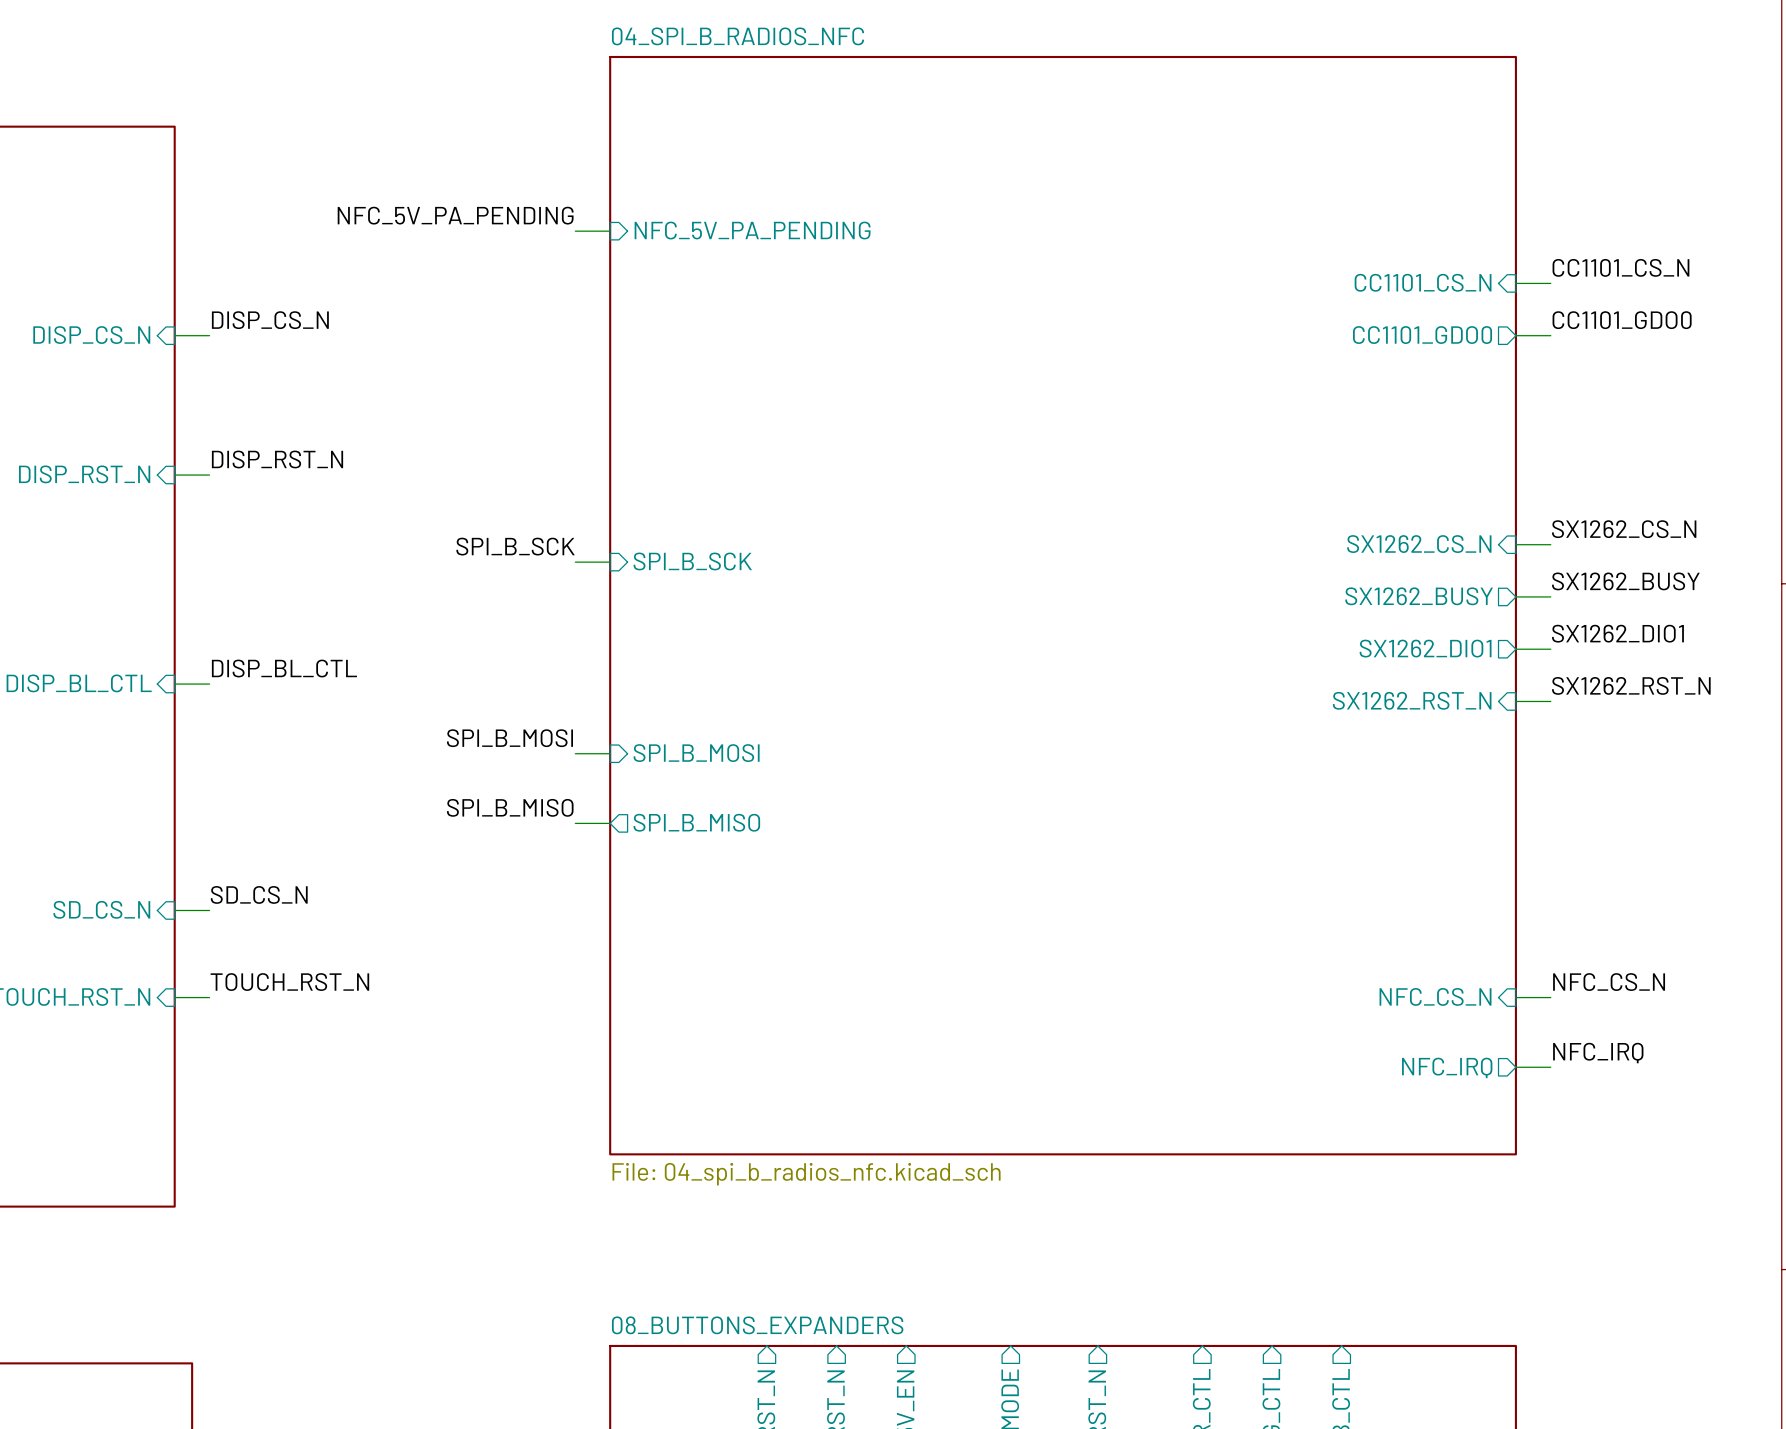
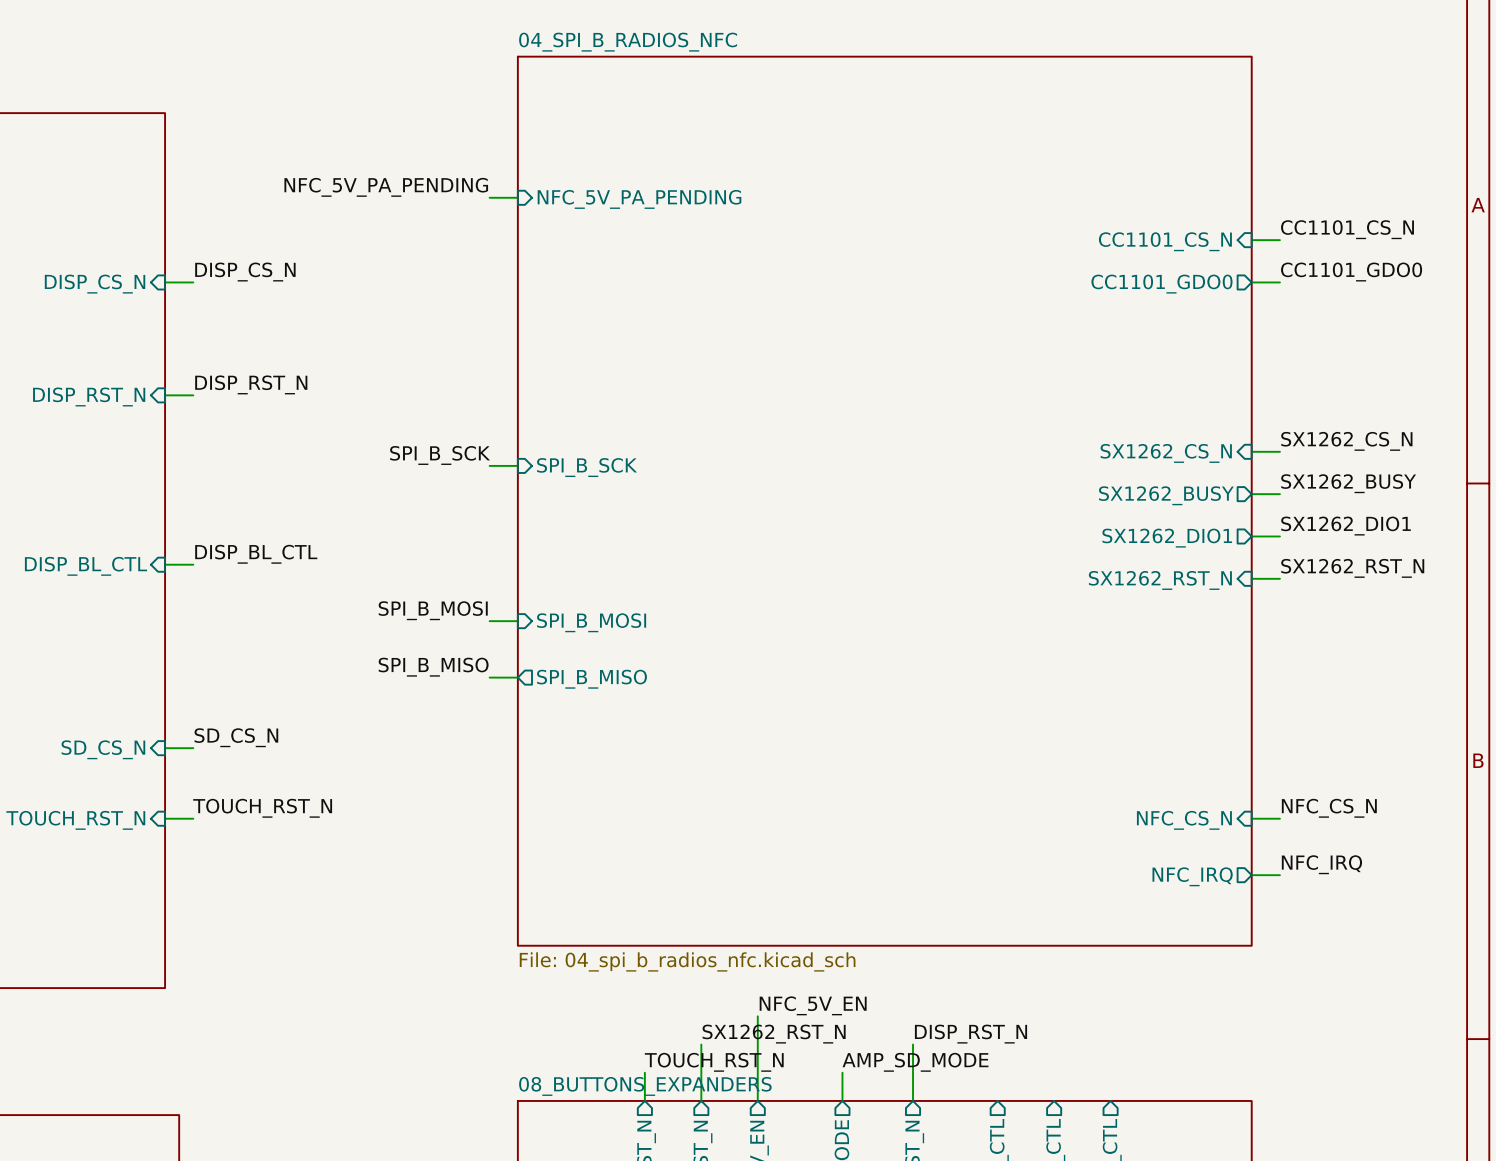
label: none -> NFC_5V_EN (813, 1005)
wire: none -> (757, 1016) (757, 1100)
label: none -> SX1262_RST_N (774, 1034)
label: none -> DISP_RST_N (971, 1034)
wire: none -> (701, 1044) (701, 1100)
wire: none -> (913, 1044) (913, 1100)
label: none -> TOUCH_RST_N (714, 1062)
label: none -> AMP_SD_MODE (915, 1062)
wire: none -> (644, 1072) (644, 1100)
wire: none -> (842, 1072) (842, 1100)

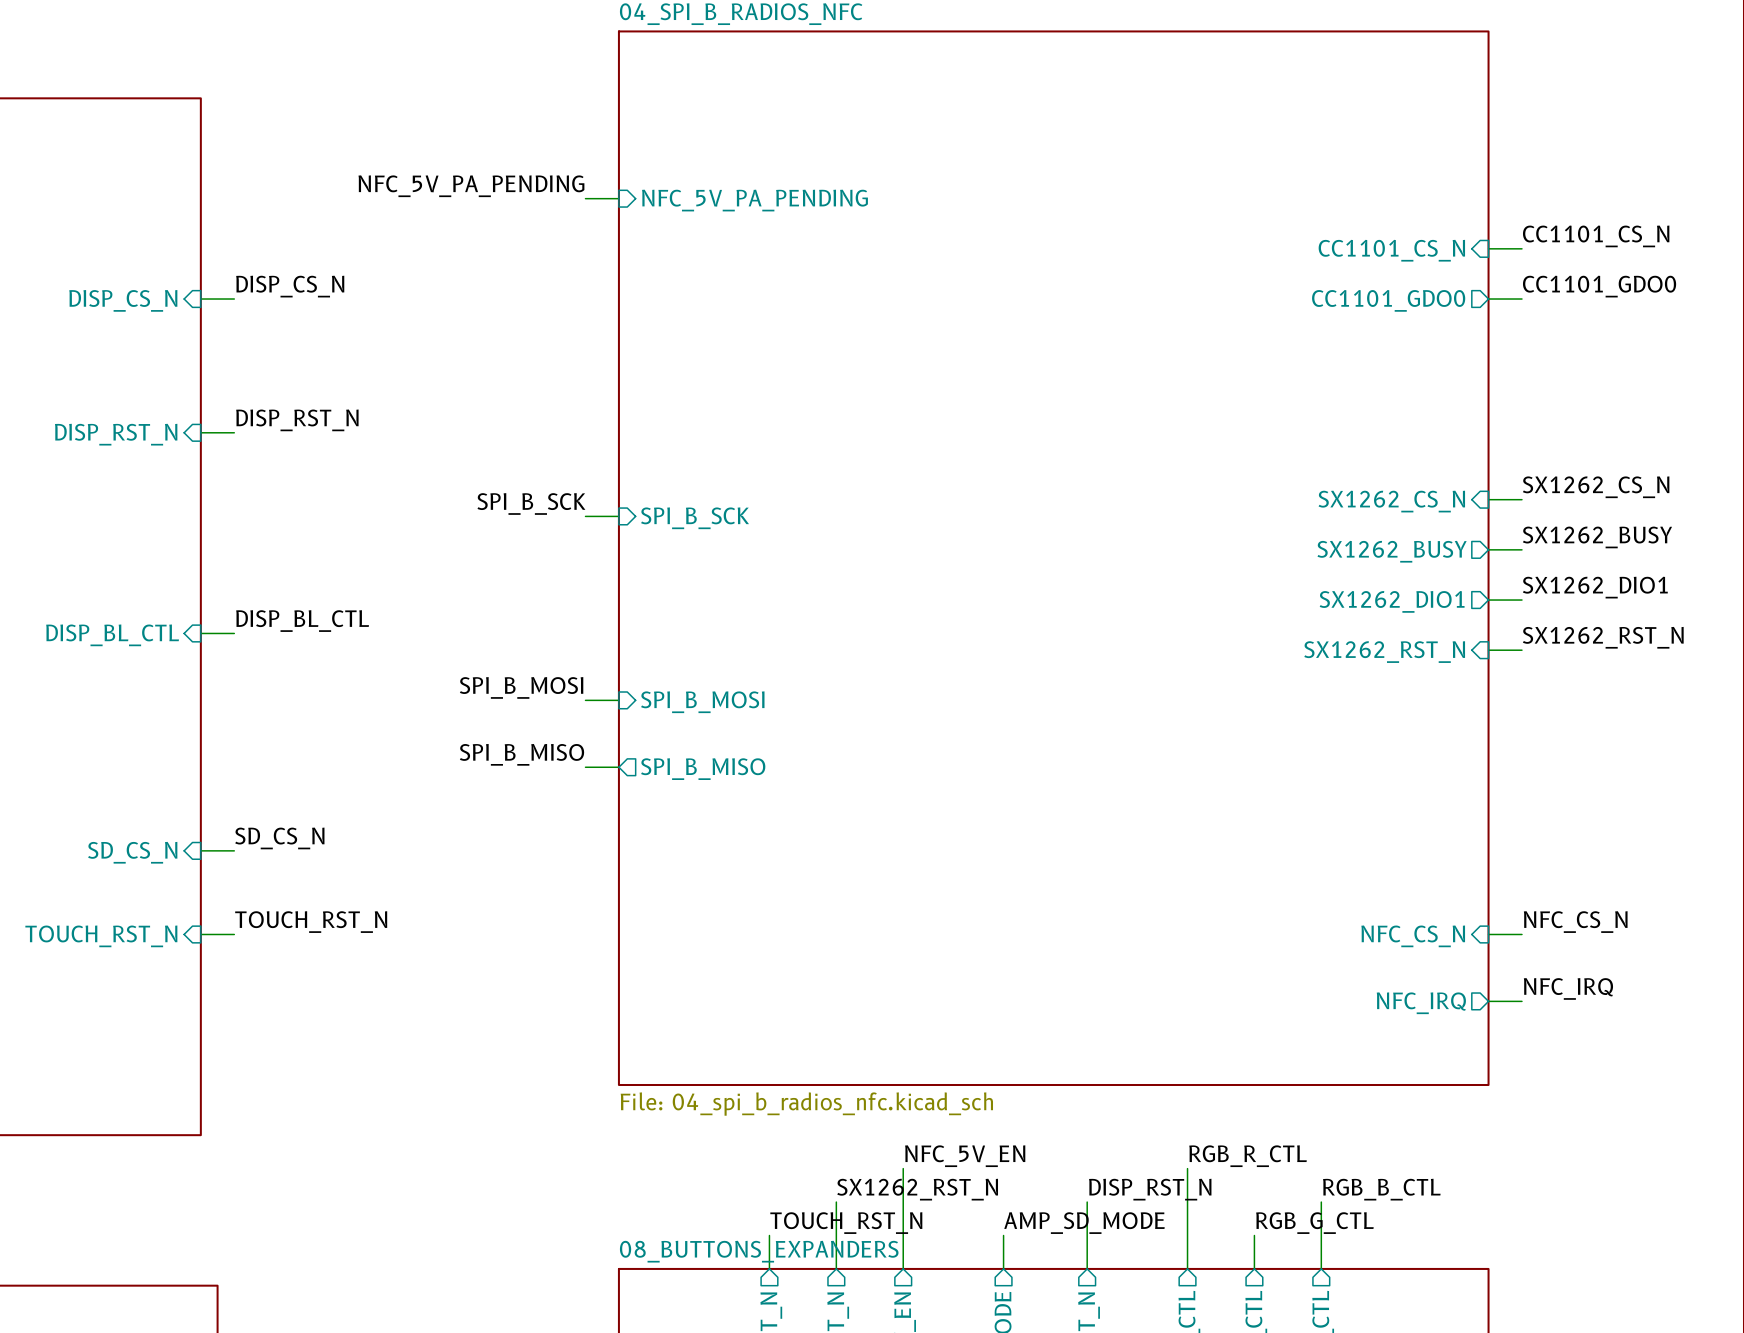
label: none -> RGB_R_CTL (1248, 1156)
wire: none -> (1187, 1168) (1187, 1268)
label: none -> RGB_B_CTL (1381, 1189)
wire: none -> (1321, 1202) (1321, 1268)
label: none -> RGB_G_CTL (1314, 1223)
wire: none -> (1254, 1235) (1254, 1268)

